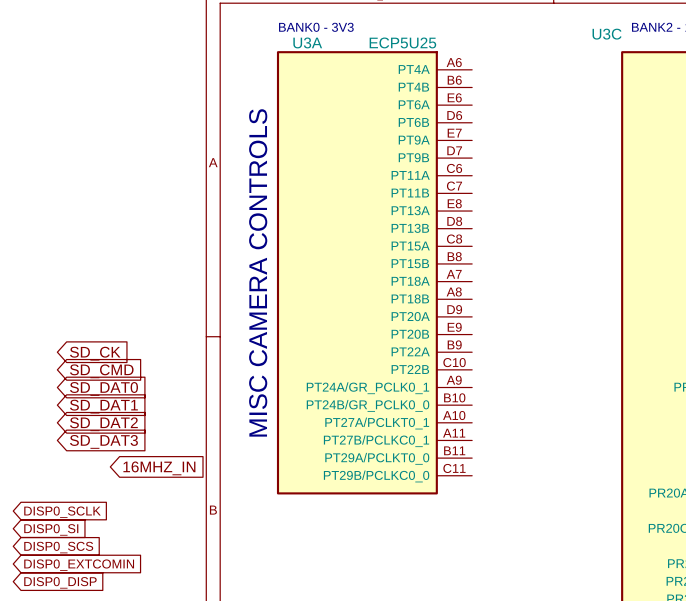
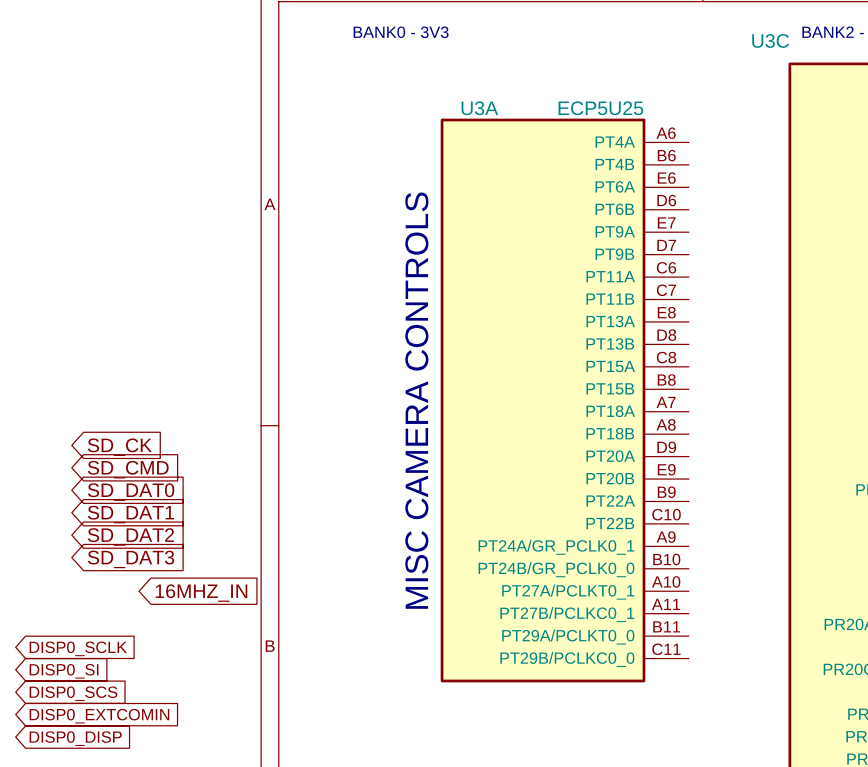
text position: MISC CAMERA CONTROLS (258, 272) -> MISC CAMERA CONTROLS (416, 400)
U3A position: (374, 272) -> (564, 400)

